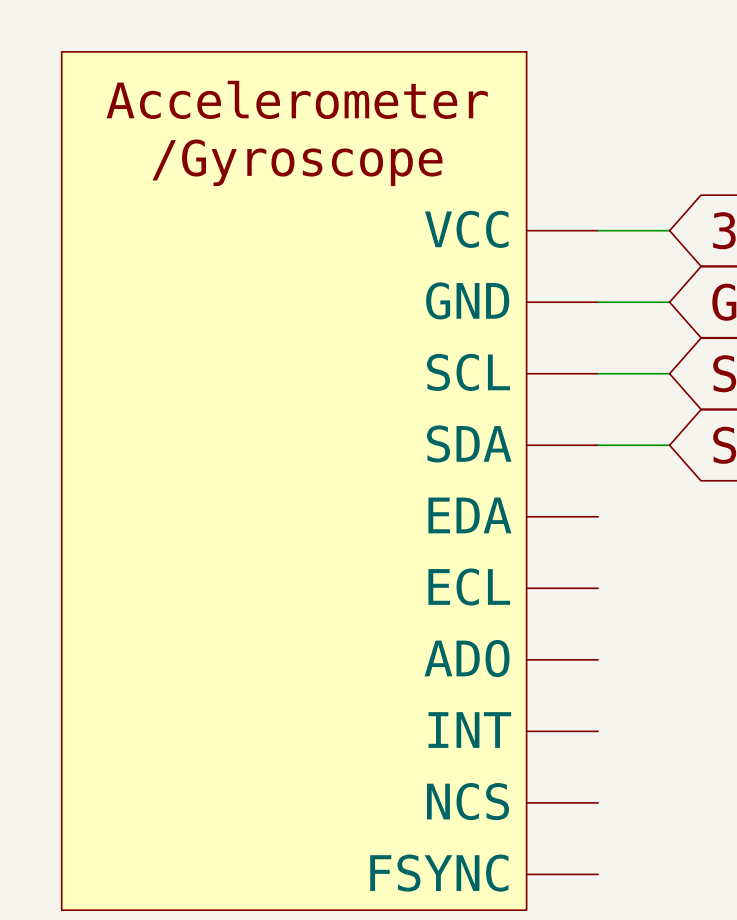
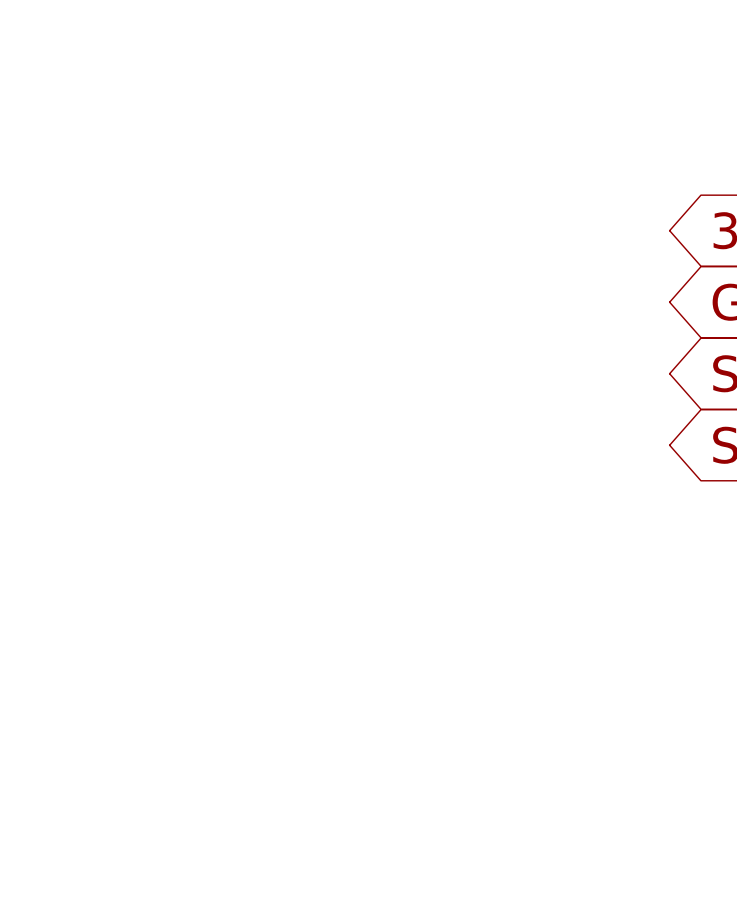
wire: (598, 230) (669, 230) -> none
wire: (598, 302) (669, 302) -> none
wire: (598, 373) (669, 373) -> none
wire: (598, 445) (669, 445) -> none
part: (329, 481) -> none

